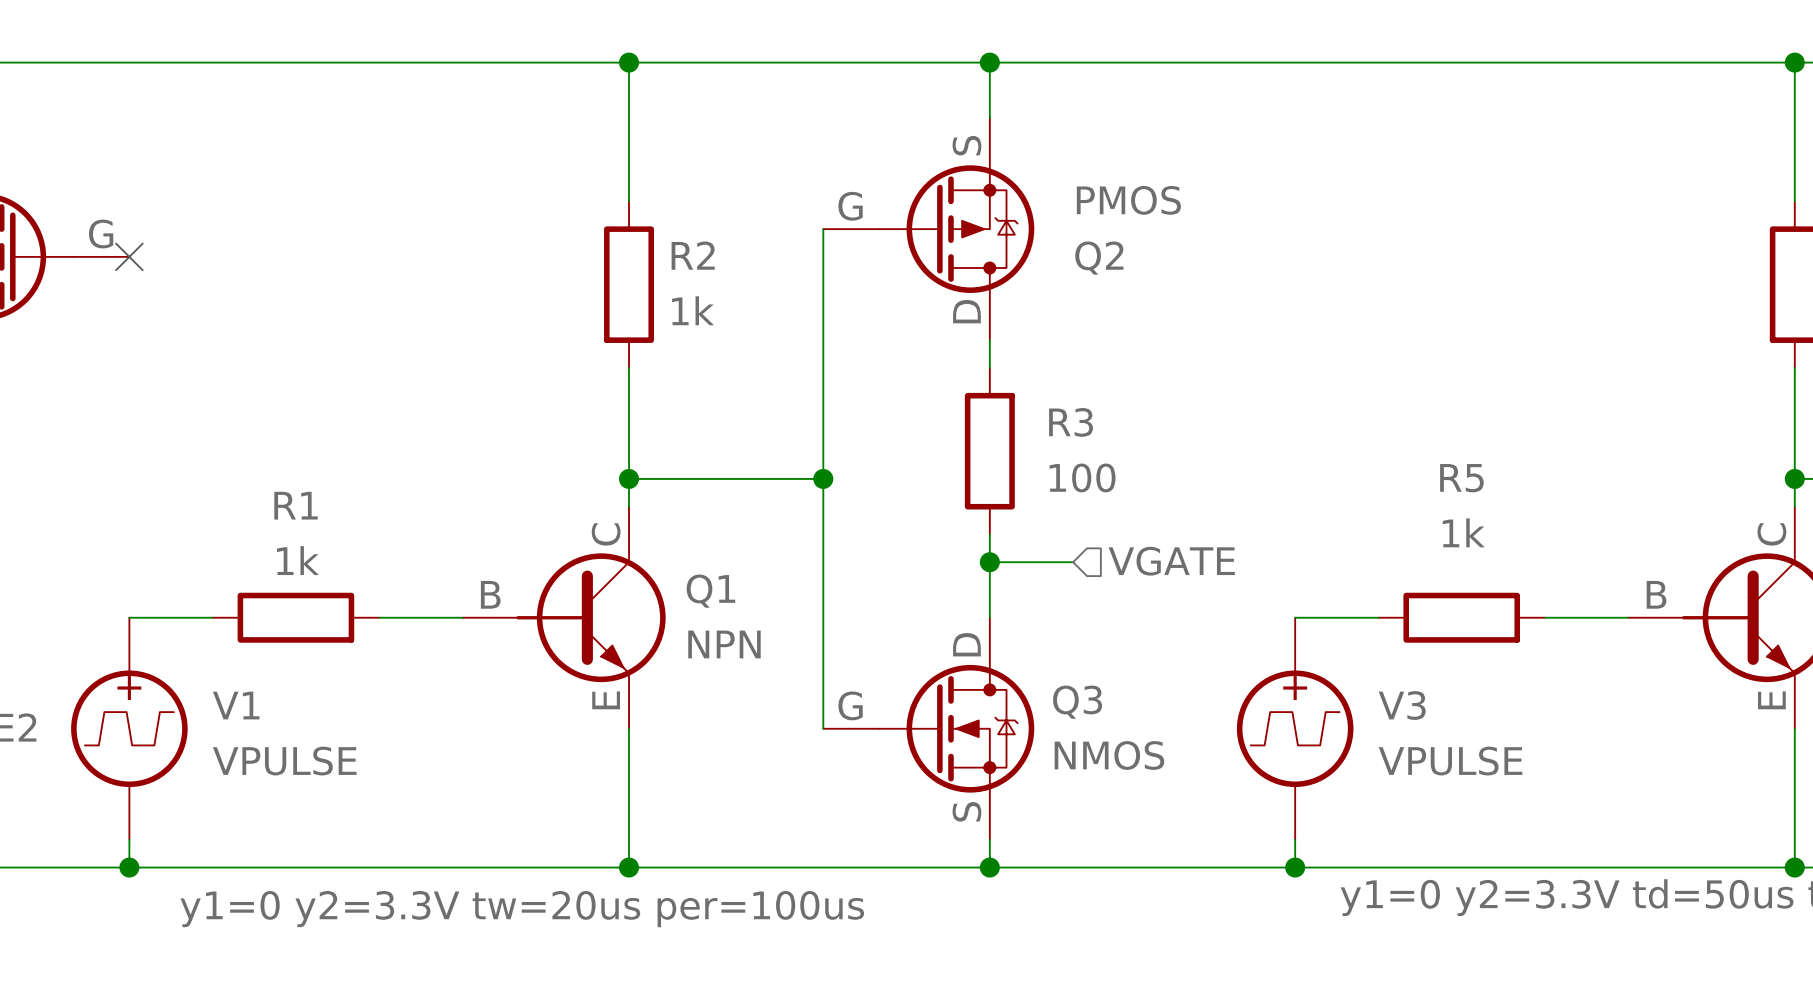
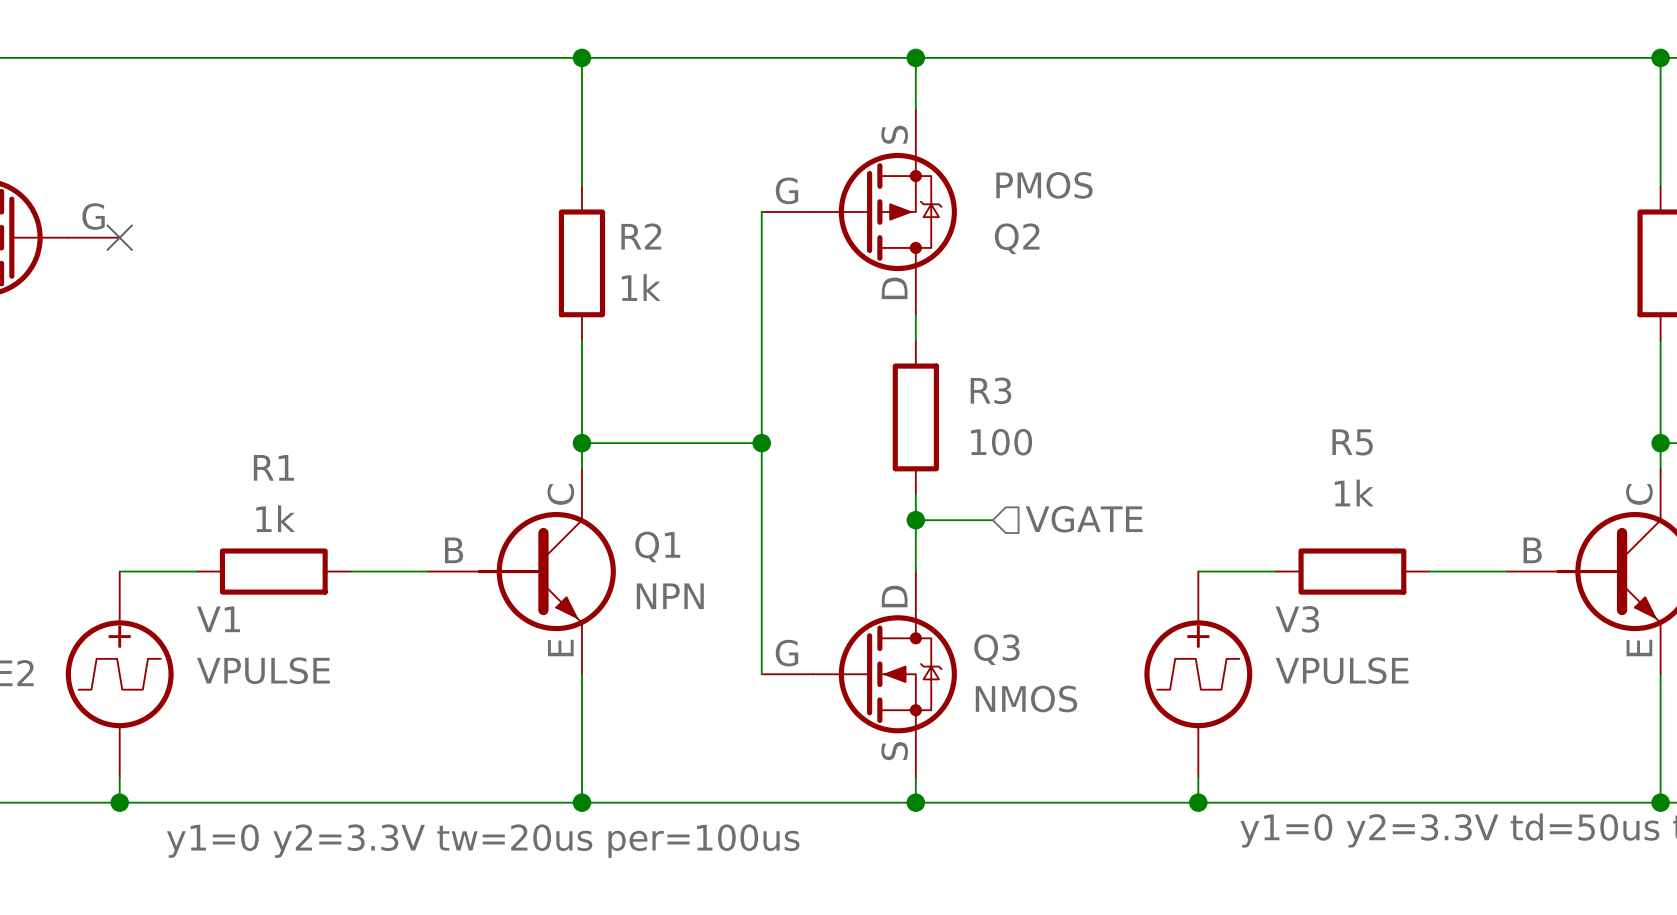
V1 name position: V1 (236, 705) -> V1 (218, 619)
V3 name position: V3 (1402, 705) -> V3 (1297, 619)
V1 value position: VPULSE (284, 761) -> VPULSE (263, 670)
V3 value position: VPULSE (1450, 761) -> VPULSE (1342, 670)

